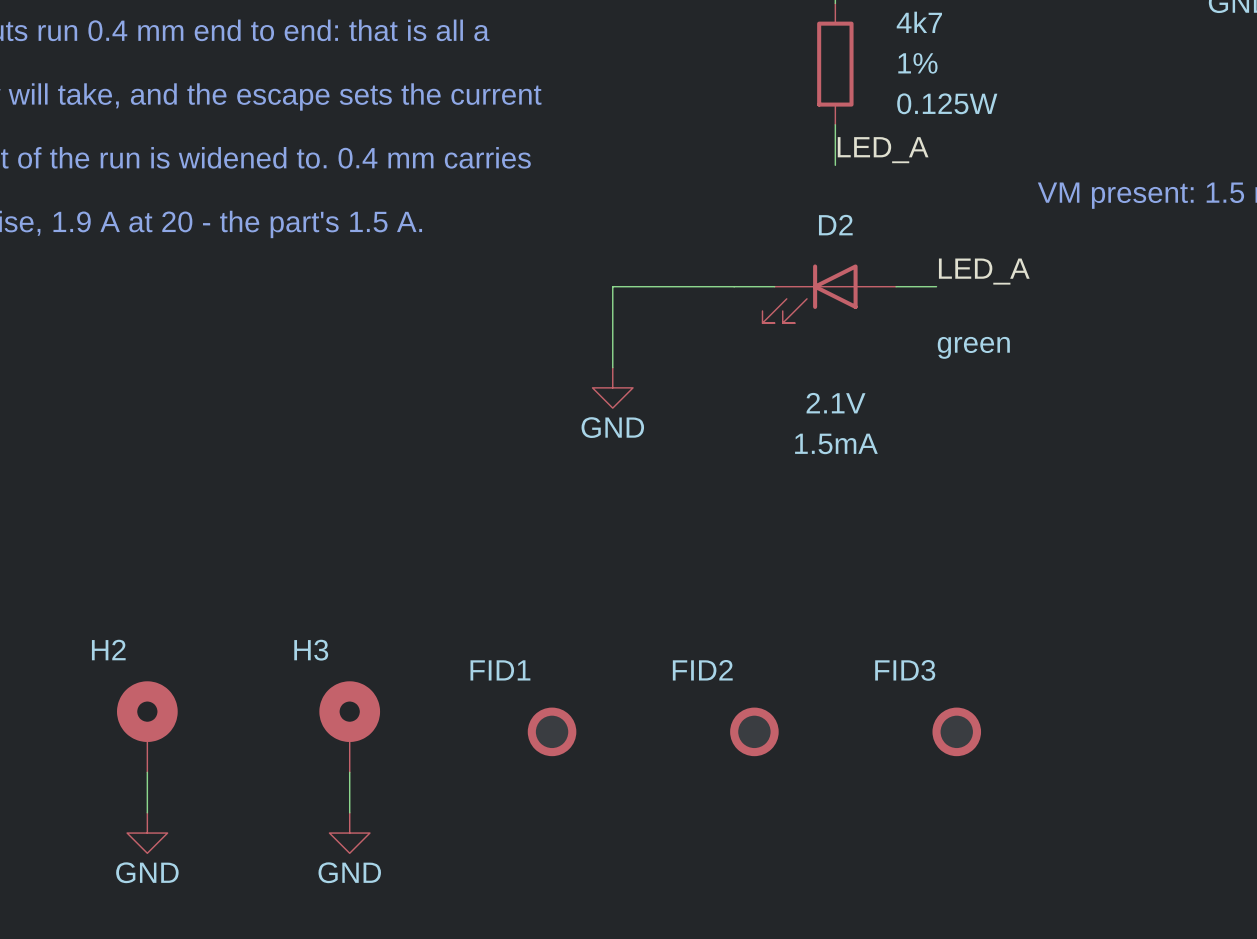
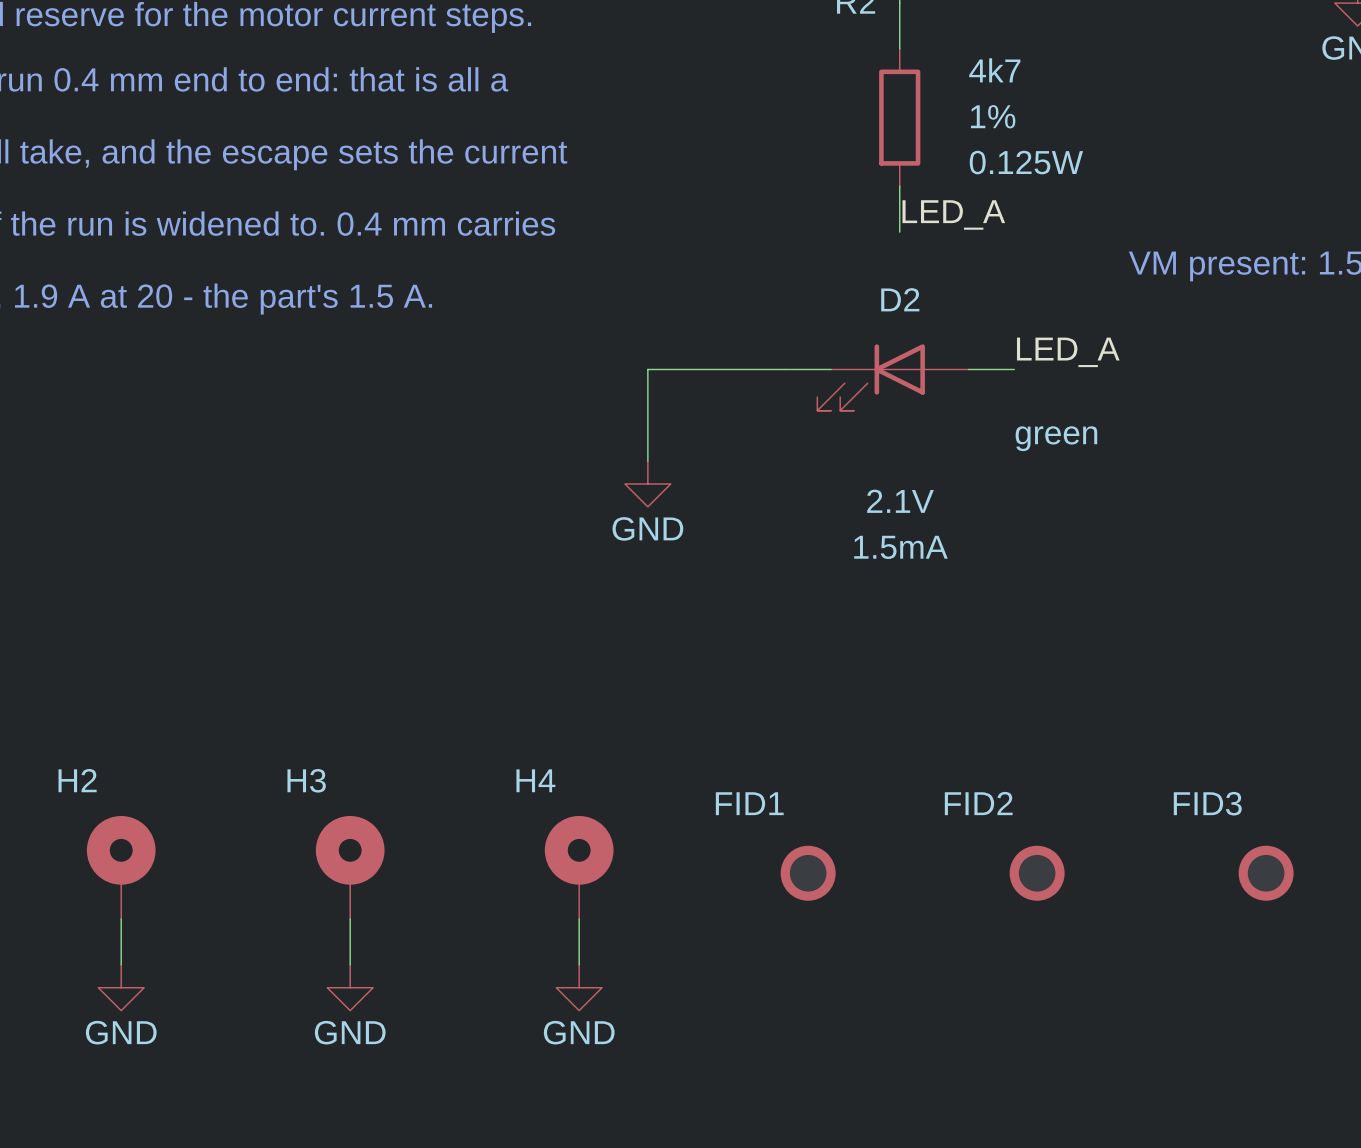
FID2 name: FID2 (702, 670) -> FID1 (749, 803)
FID3 name: FID3 (905, 670) -> FID2 (978, 803)
H4: none -> (579, 867)
FID1: (552, 731) -> none
FID3: none -> (1266, 873)
wire: none -> (579, 919) (579, 964)
power symbol: none -> GND (579, 987)

